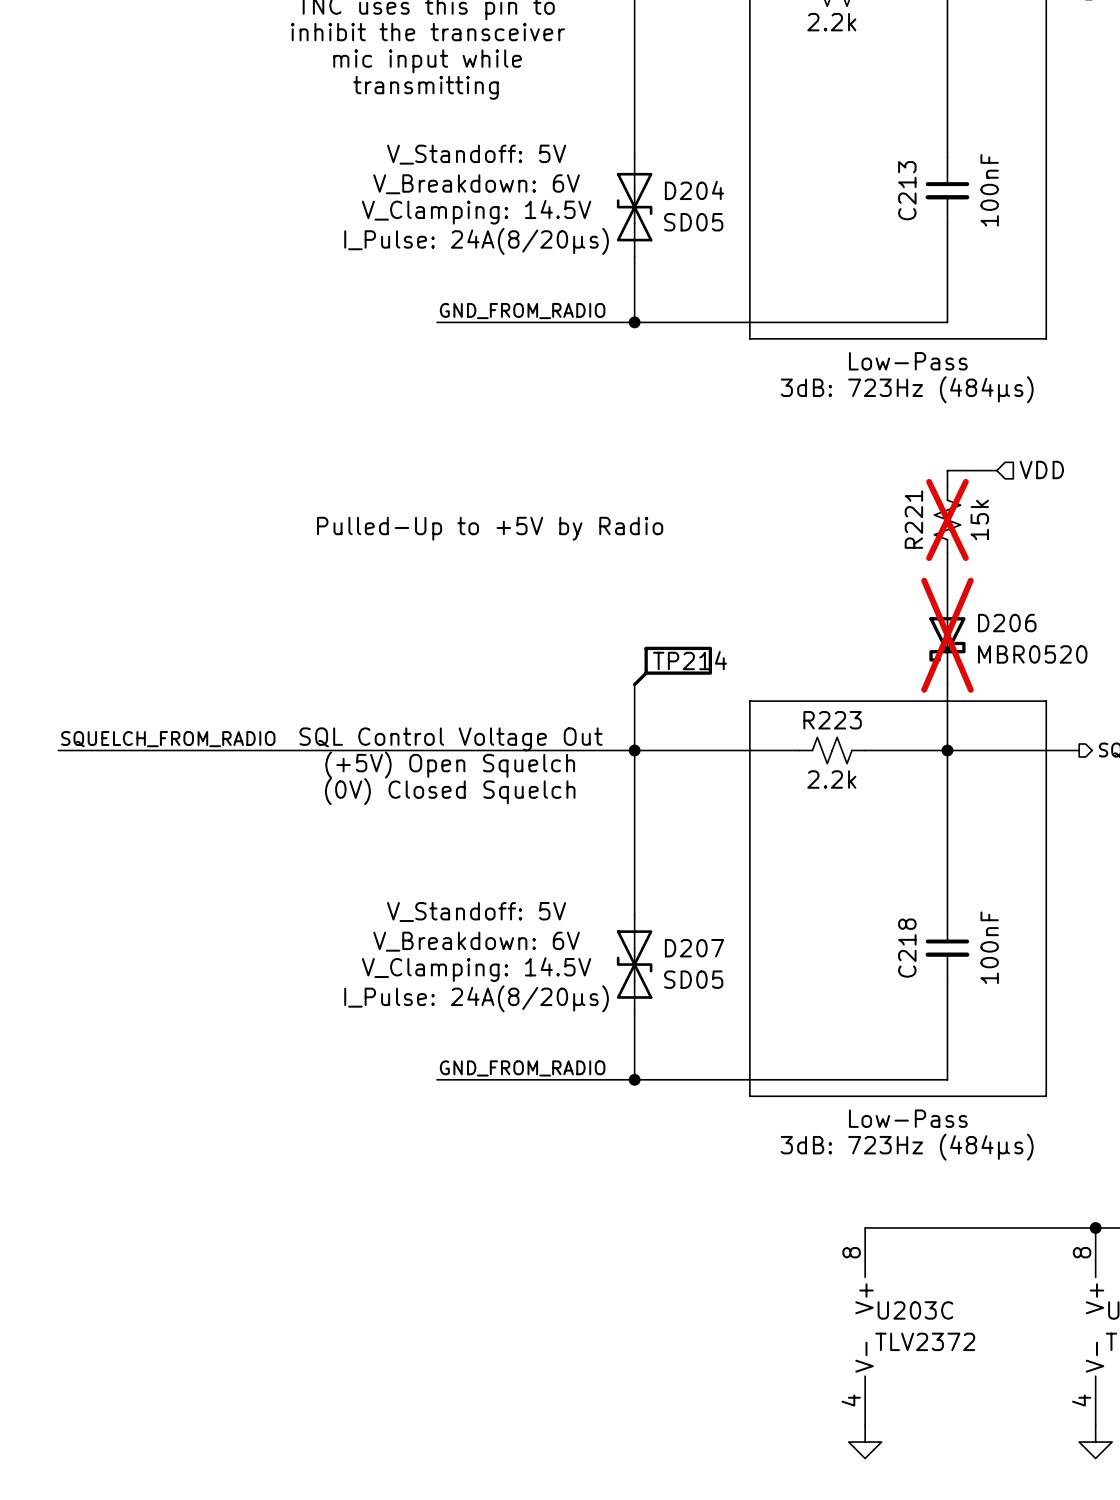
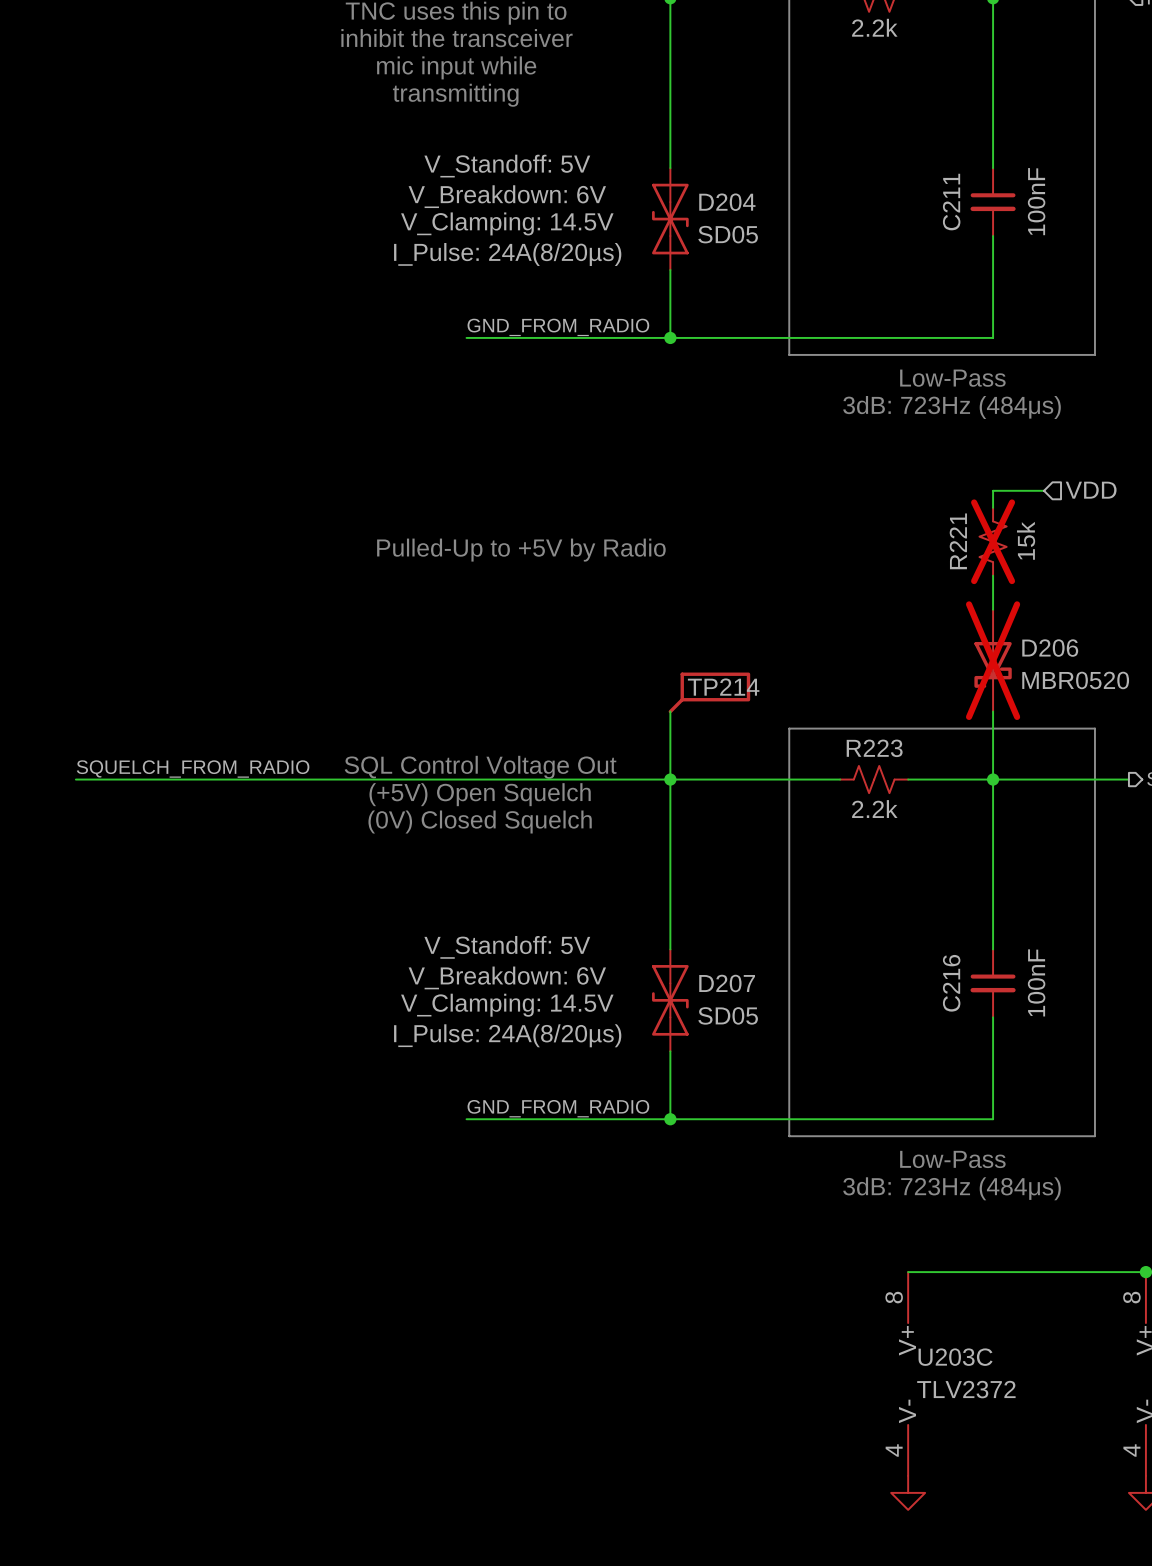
C213 name: C213 (907, 190) -> C211 (951, 202)
C218 name: C218 (907, 948) -> C216 (951, 983)

